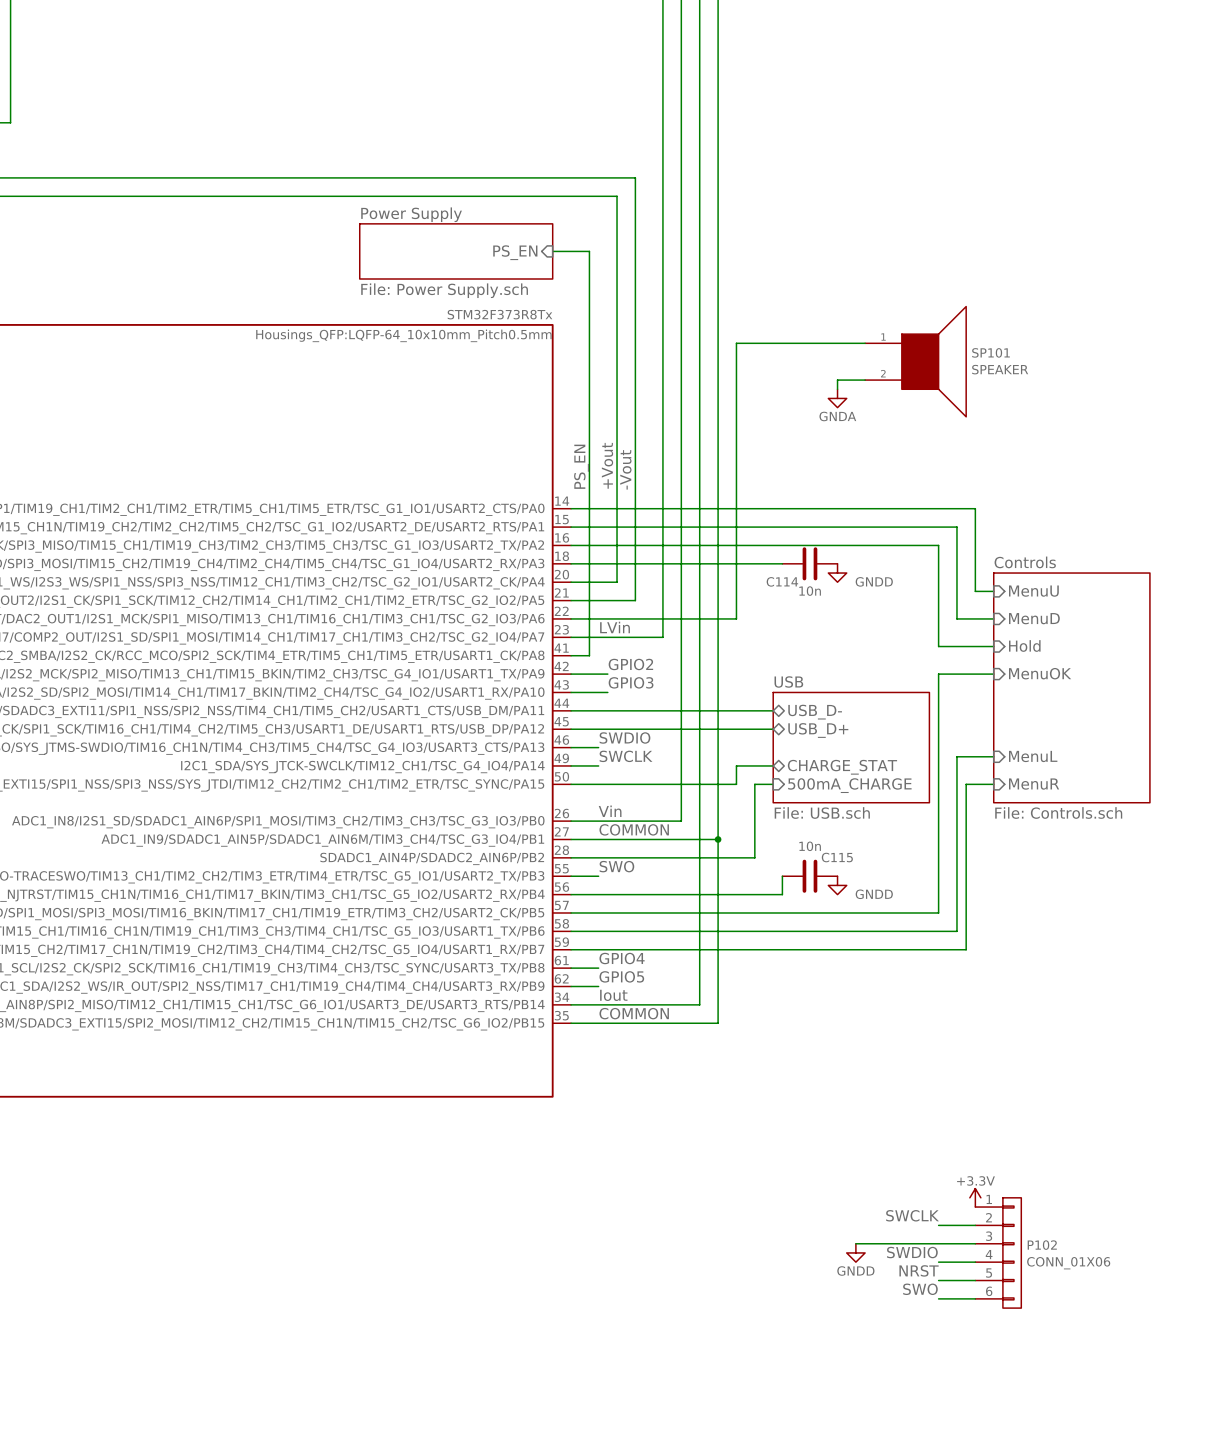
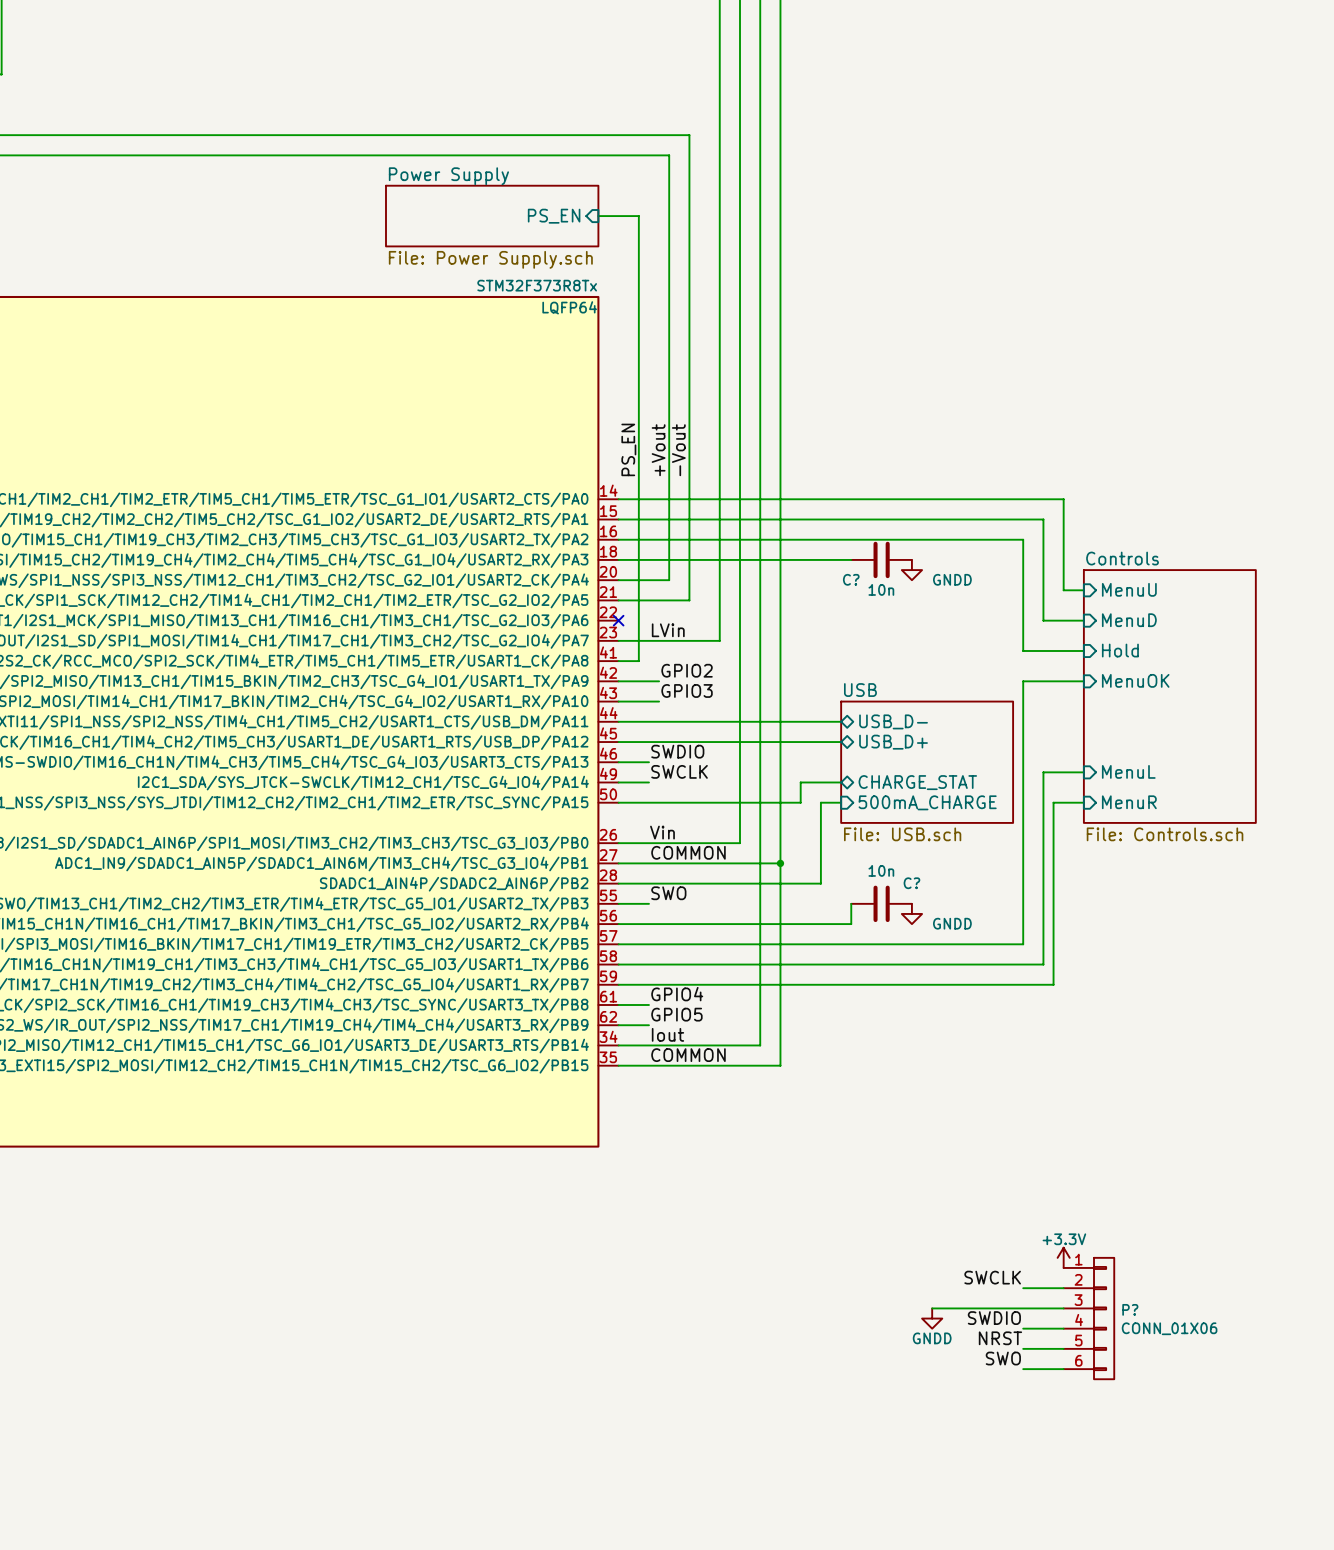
part text: Housings_QFP:LQFP-64_10x10mm_Pitch0.5mm (403, 335) -> LQFP64 (569, 307)
wire: (865, 343) (736, 343) (736, 618) (571, 618) -> none
SP101: SPEAKER (915, 361) -> none
wire: (865, 380) (837, 380) (837, 389) -> none
power symbol: GNDA (837, 398) -> none
C114 name: C114 (782, 581) -> C? (851, 579)
no-connect mark: none -> (618, 620)
C115 name: C115 (837, 857) -> C? (911, 883)
P102 name: P102 (1042, 1245) -> P? (1130, 1309)

